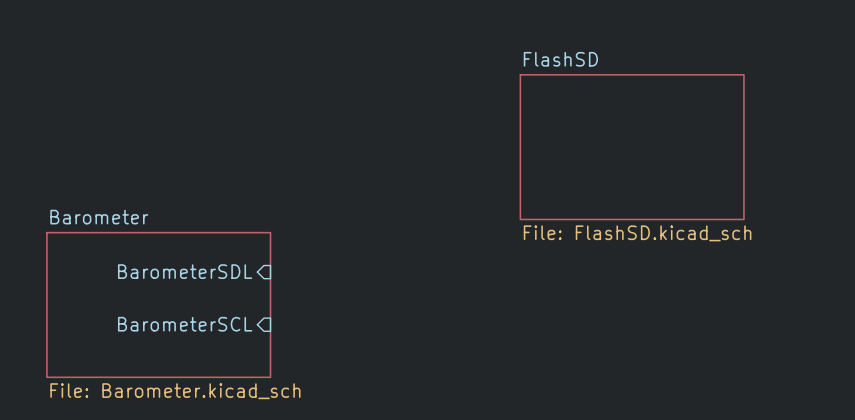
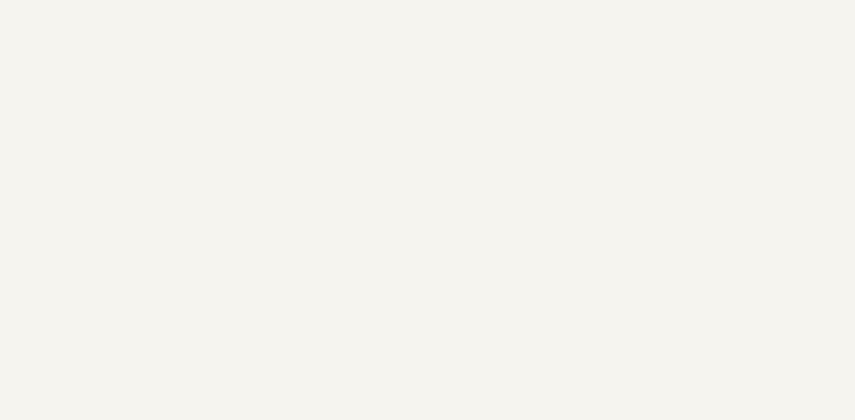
sheet FlashSD: File: FlashSD.kicad_sch (632, 147) -> none
sheet pin: BarometerSDL (185, 271) -> none
sheet Barometer: File: Barometer.kicad_sch (158, 304) -> none
sheet pin: BarometerSCL (185, 324) -> none

